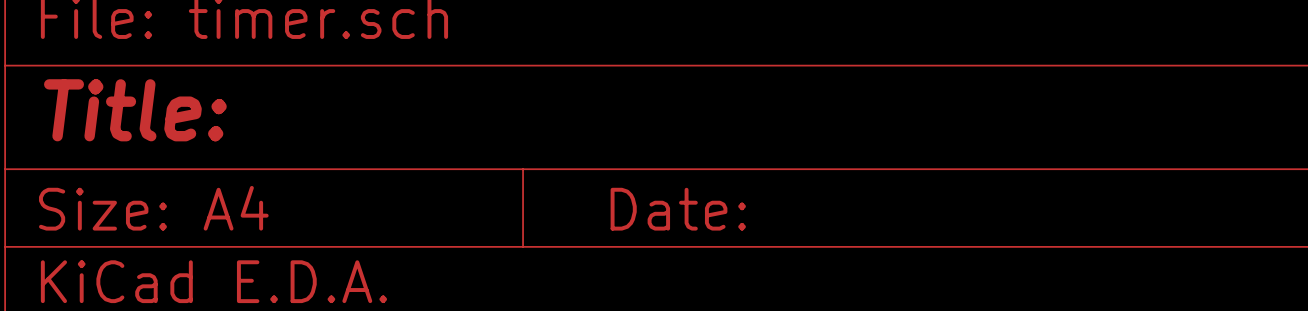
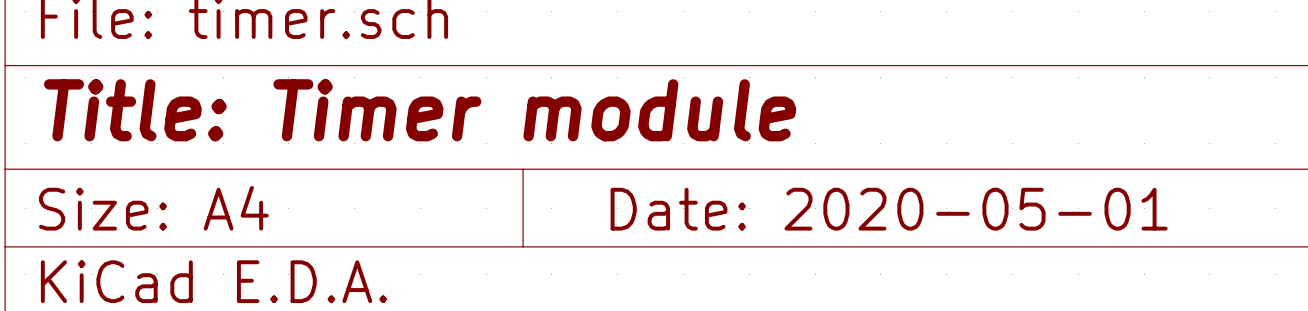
title block: Title: (135, 110) -> Title: Timer module (420, 110)
title block: Date: (678, 209) -> Date: 2020-05-01 (889, 209)

